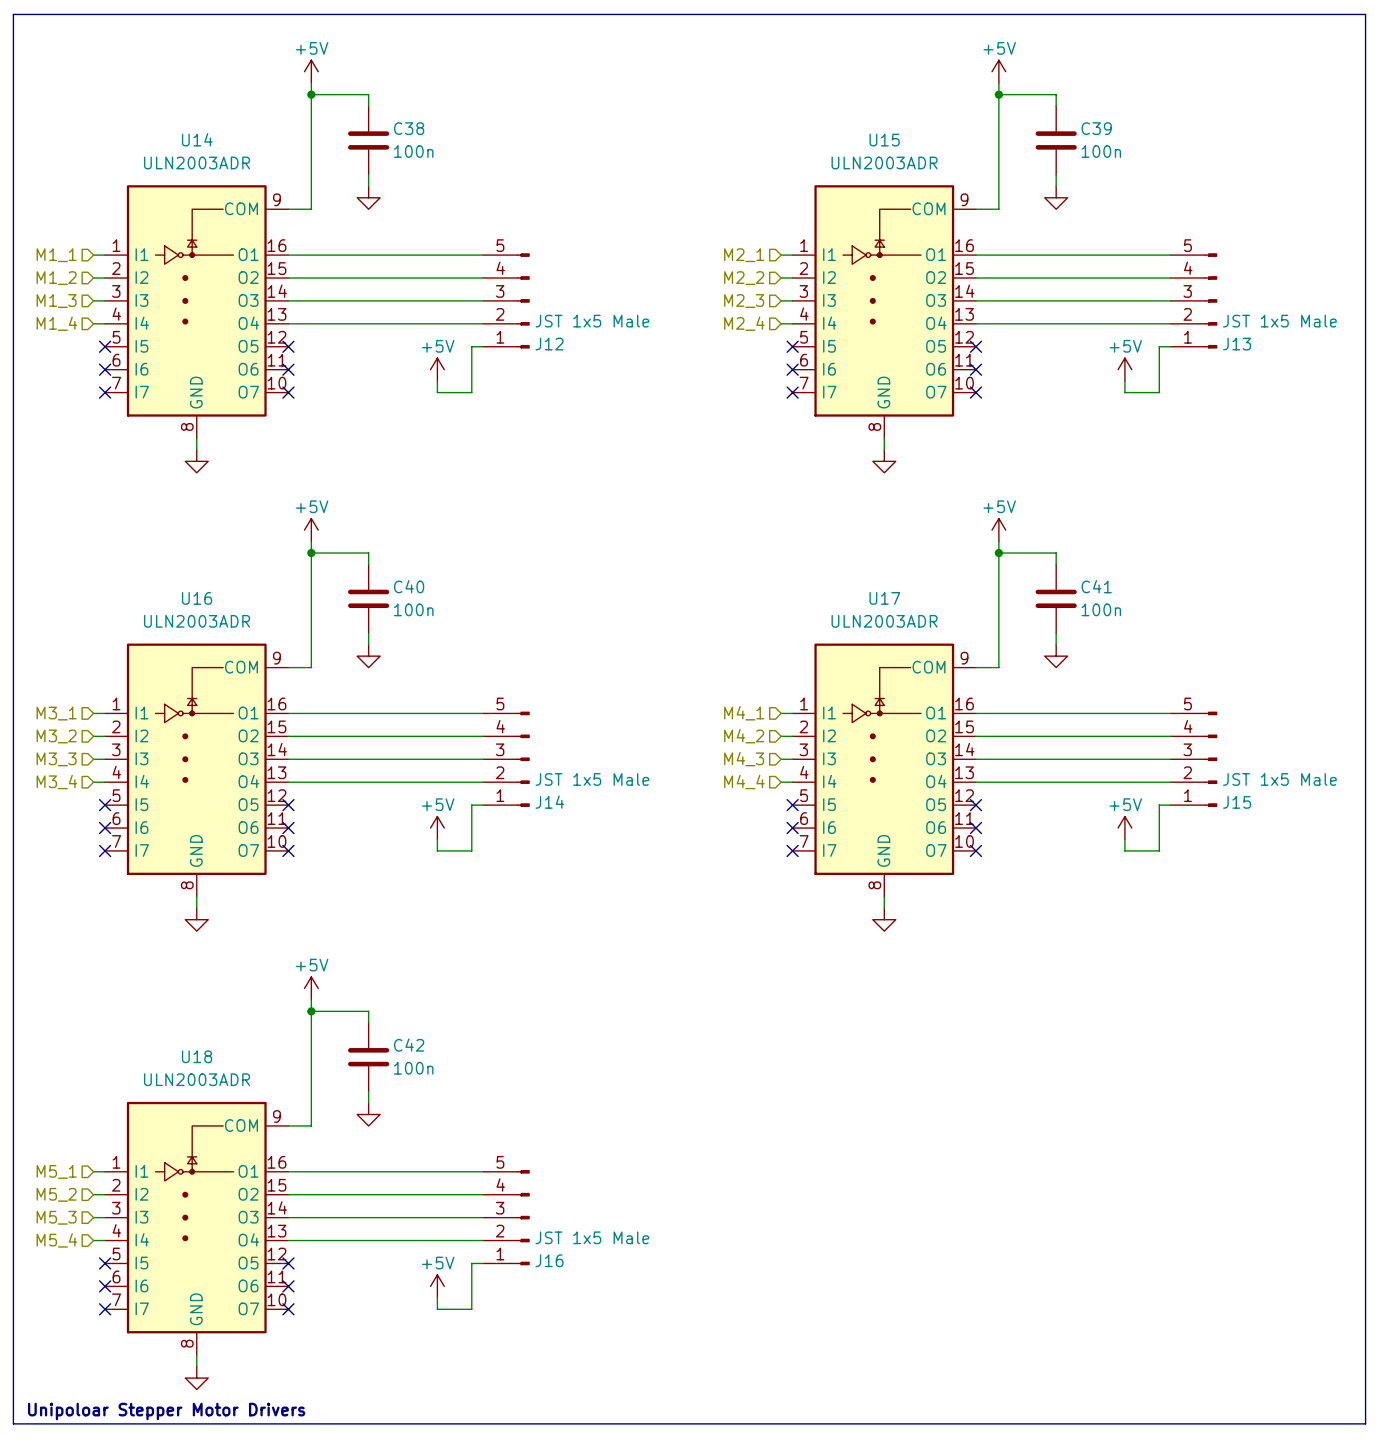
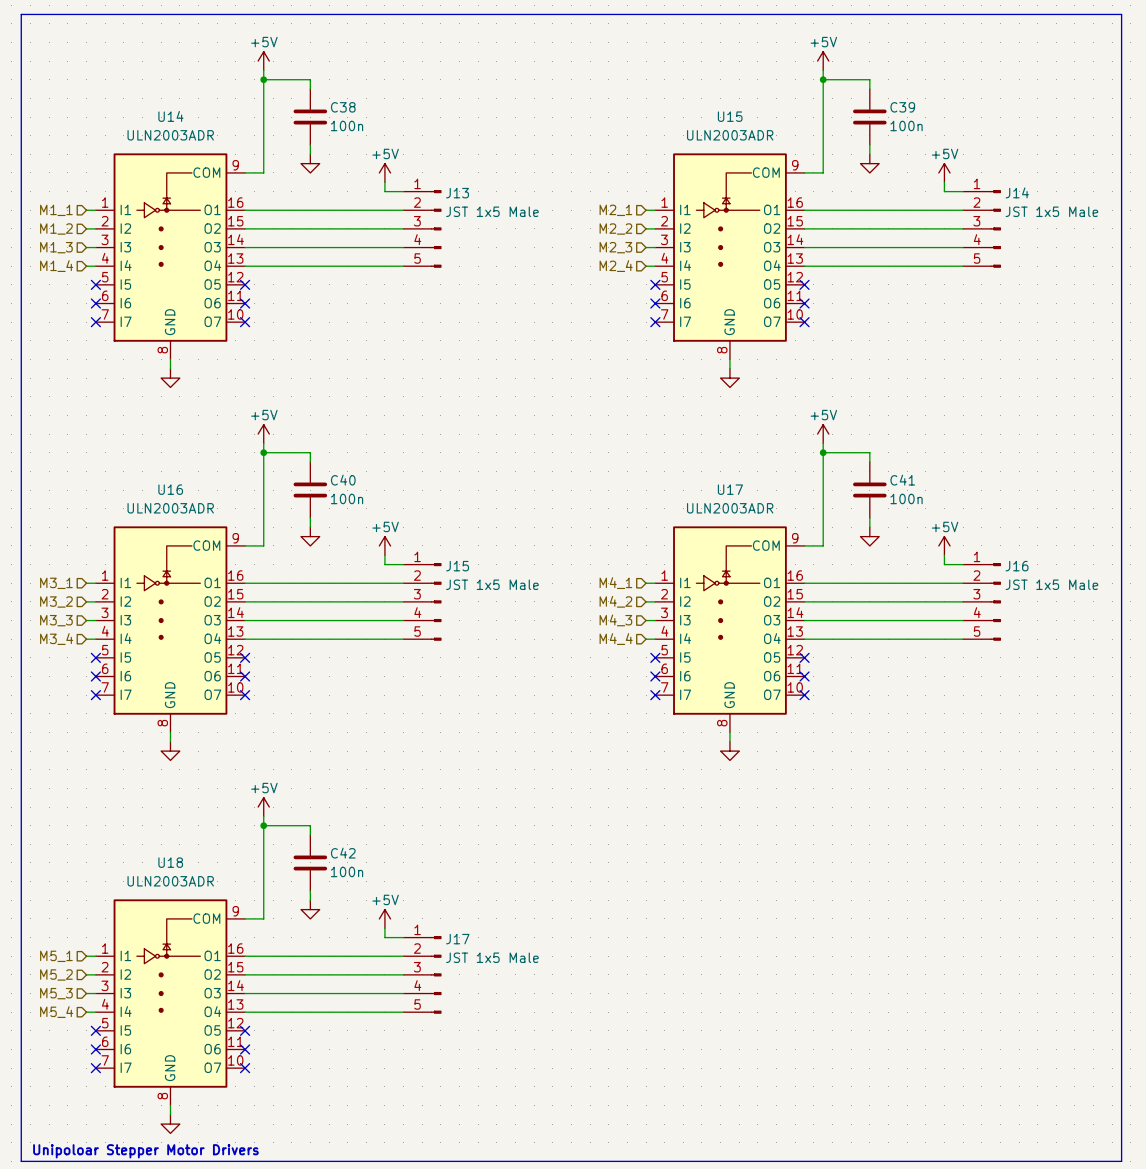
power symbol: none -> +5V (384, 172)
power symbol: none -> +5V (944, 172)
wire: none -> (384, 182) (384, 191) (403, 191)
wire: none -> (944, 182) (944, 191) (963, 191)
J12: JST 1x5 Male (506, 300) -> none
J13 position: (1194, 300) -> (422, 228)
J13 flip: as is (1210, 300) -> up-down (436, 228)
wire: (483, 346) (471, 346) (471, 392) (437, 392) (437, 381) -> none
wire: (1170, 346) (1159, 346) (1159, 392) (1124, 392) (1124, 381) -> none
power symbol: +5V (437, 369) -> none
power symbol: +5V (1124, 369) -> none
power symbol: none -> +5V (384, 545)
power symbol: none -> +5V (944, 545)
wire: none -> (384, 555) (384, 564) (403, 564)
wire: none -> (944, 555) (944, 564) (963, 564)
J14 position: (506, 759) -> (982, 228)
J14 flip: as is (523, 759) -> up-down (995, 228)
J15 position: (1194, 759) -> (422, 601)
J15 flip: as is (1210, 759) -> up-down (436, 601)
wire: (483, 805) (471, 805) (471, 850) (437, 850) (437, 839) -> none
wire: (1170, 805) (1159, 805) (1159, 850) (1124, 850) (1124, 839) -> none
power symbol: +5V (437, 828) -> none
power symbol: +5V (1124, 828) -> none
power symbol: none -> +5V (384, 918)
wire: none -> (384, 928) (384, 937) (403, 937)
J17: none -> JST 1x5 Male (422, 974)
J16 position: (506, 1217) -> (982, 601)
J16 flip: as is (523, 1217) -> up-down (995, 601)
wire: (483, 1263) (471, 1263) (471, 1309) (437, 1309) (437, 1297) -> none
power symbol: +5V (437, 1286) -> none

